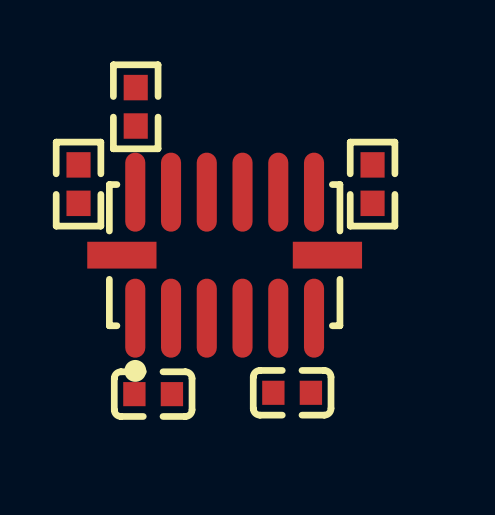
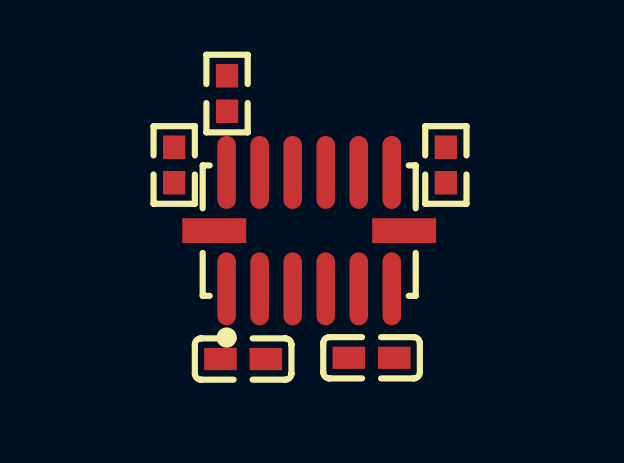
part footprint: [249, 367, 335, 419] -> [320, 334, 423, 382]
part footprint: [110, 368, 196, 420] -> [191, 335, 295, 383]

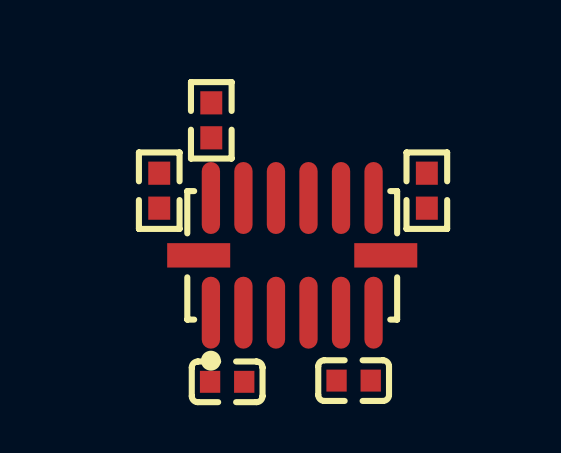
part footprint: [320, 334, 423, 382] -> [315, 357, 393, 404]
part footprint: [191, 335, 295, 383] -> [188, 358, 266, 406]

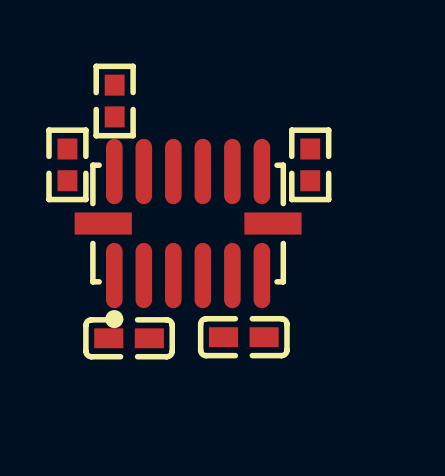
part footprint: [315, 357, 393, 404] -> [197, 315, 290, 359]
part footprint: [188, 358, 266, 406] -> [83, 317, 176, 360]

